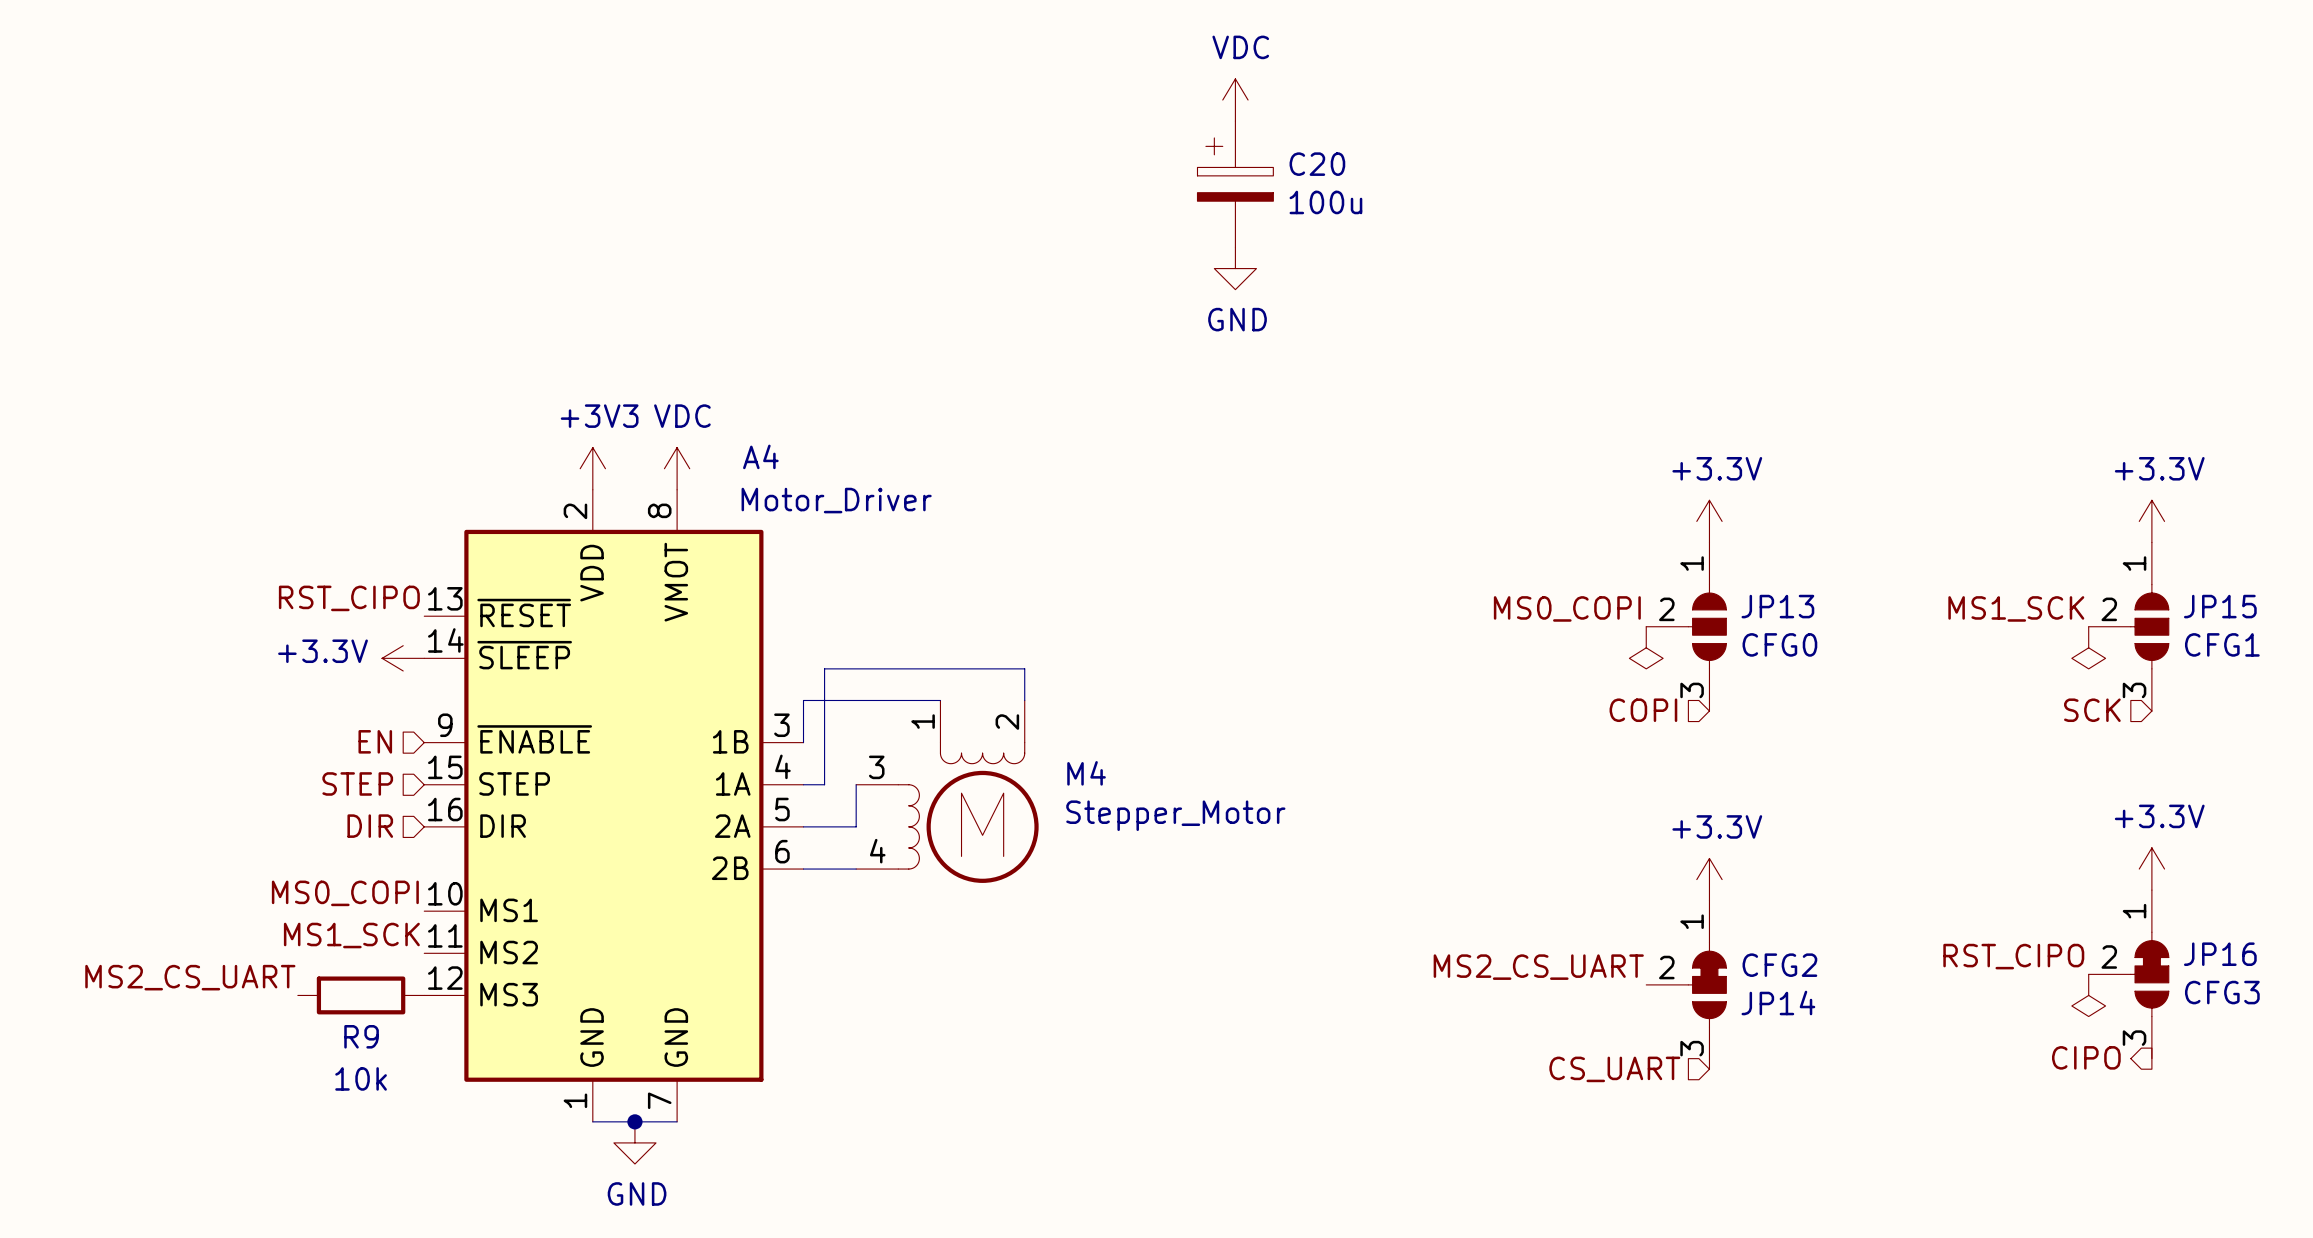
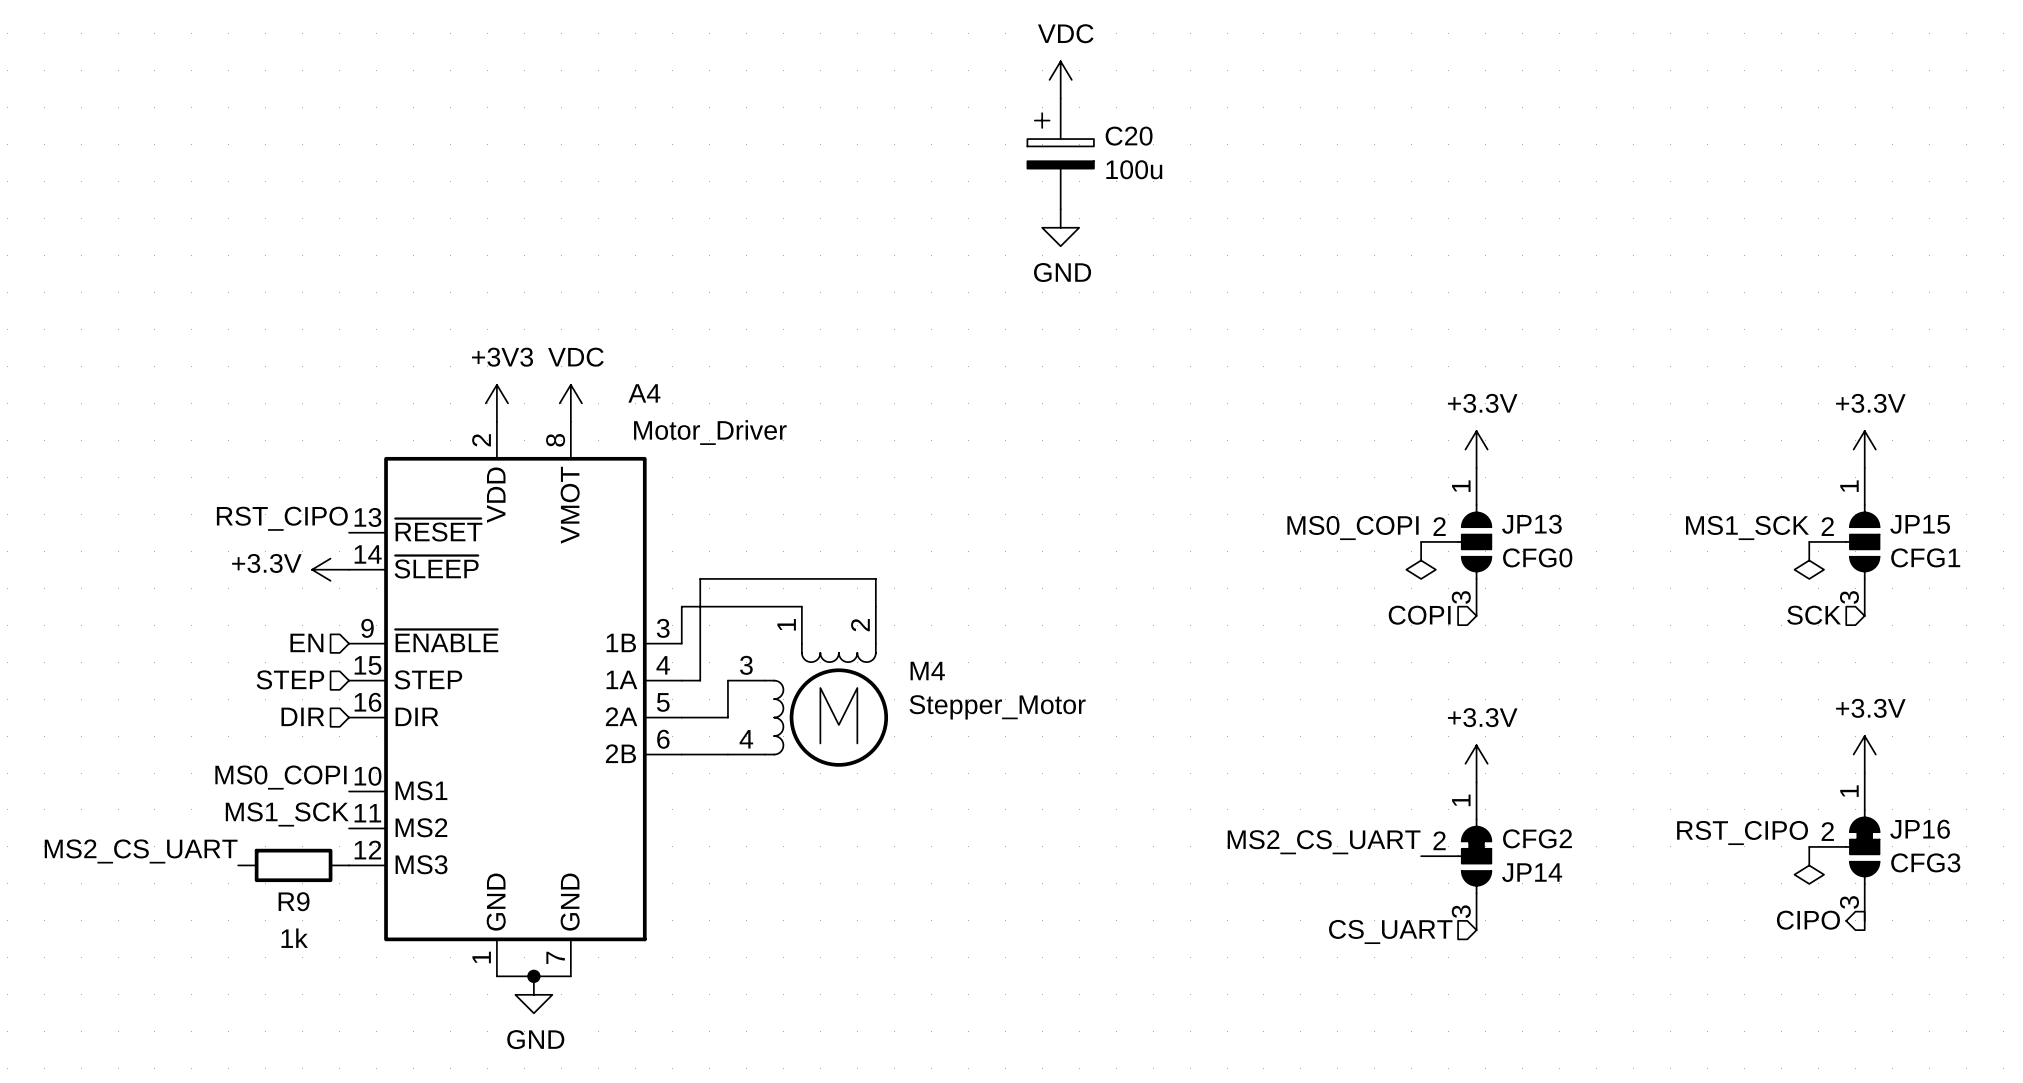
R9 value: 10k (361, 1078) -> 1k (294, 938)

